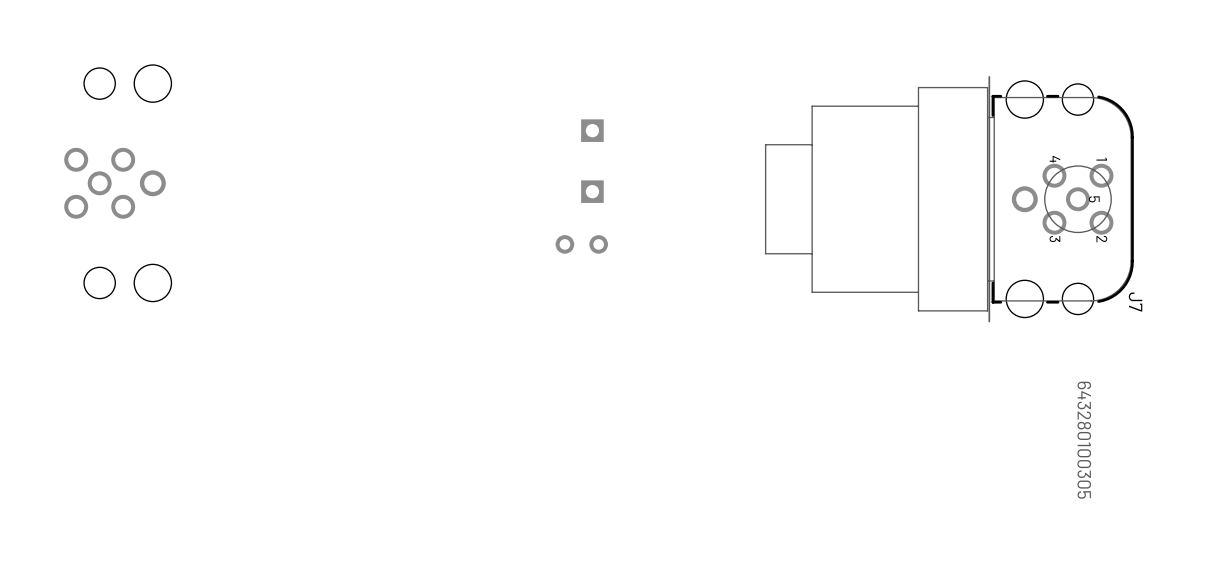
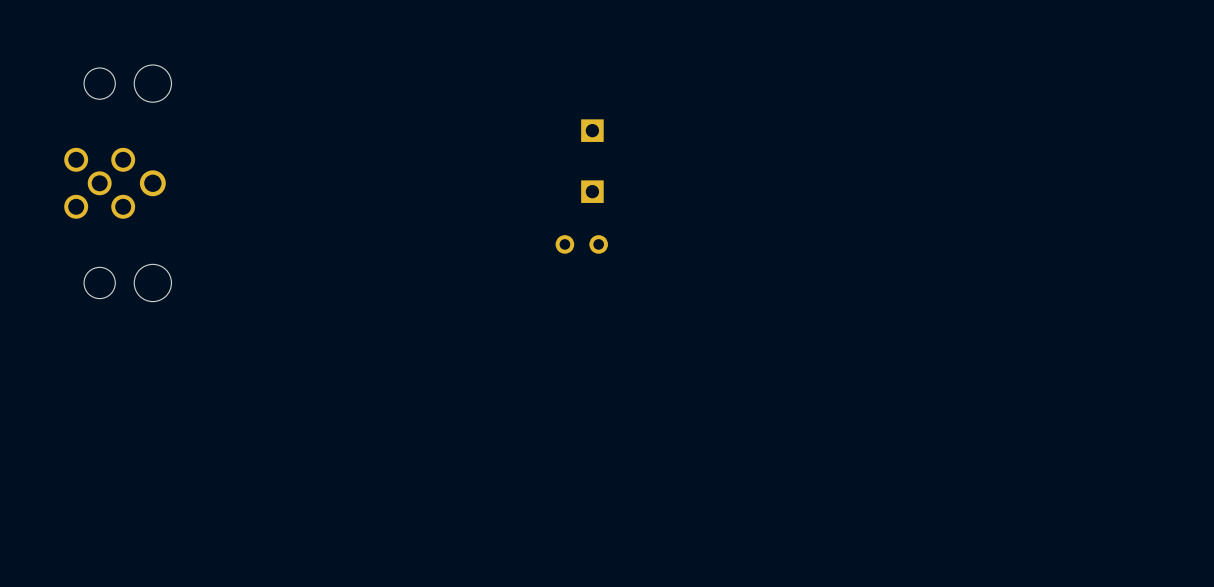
J7: 643280100305 (949, 199) -> none

